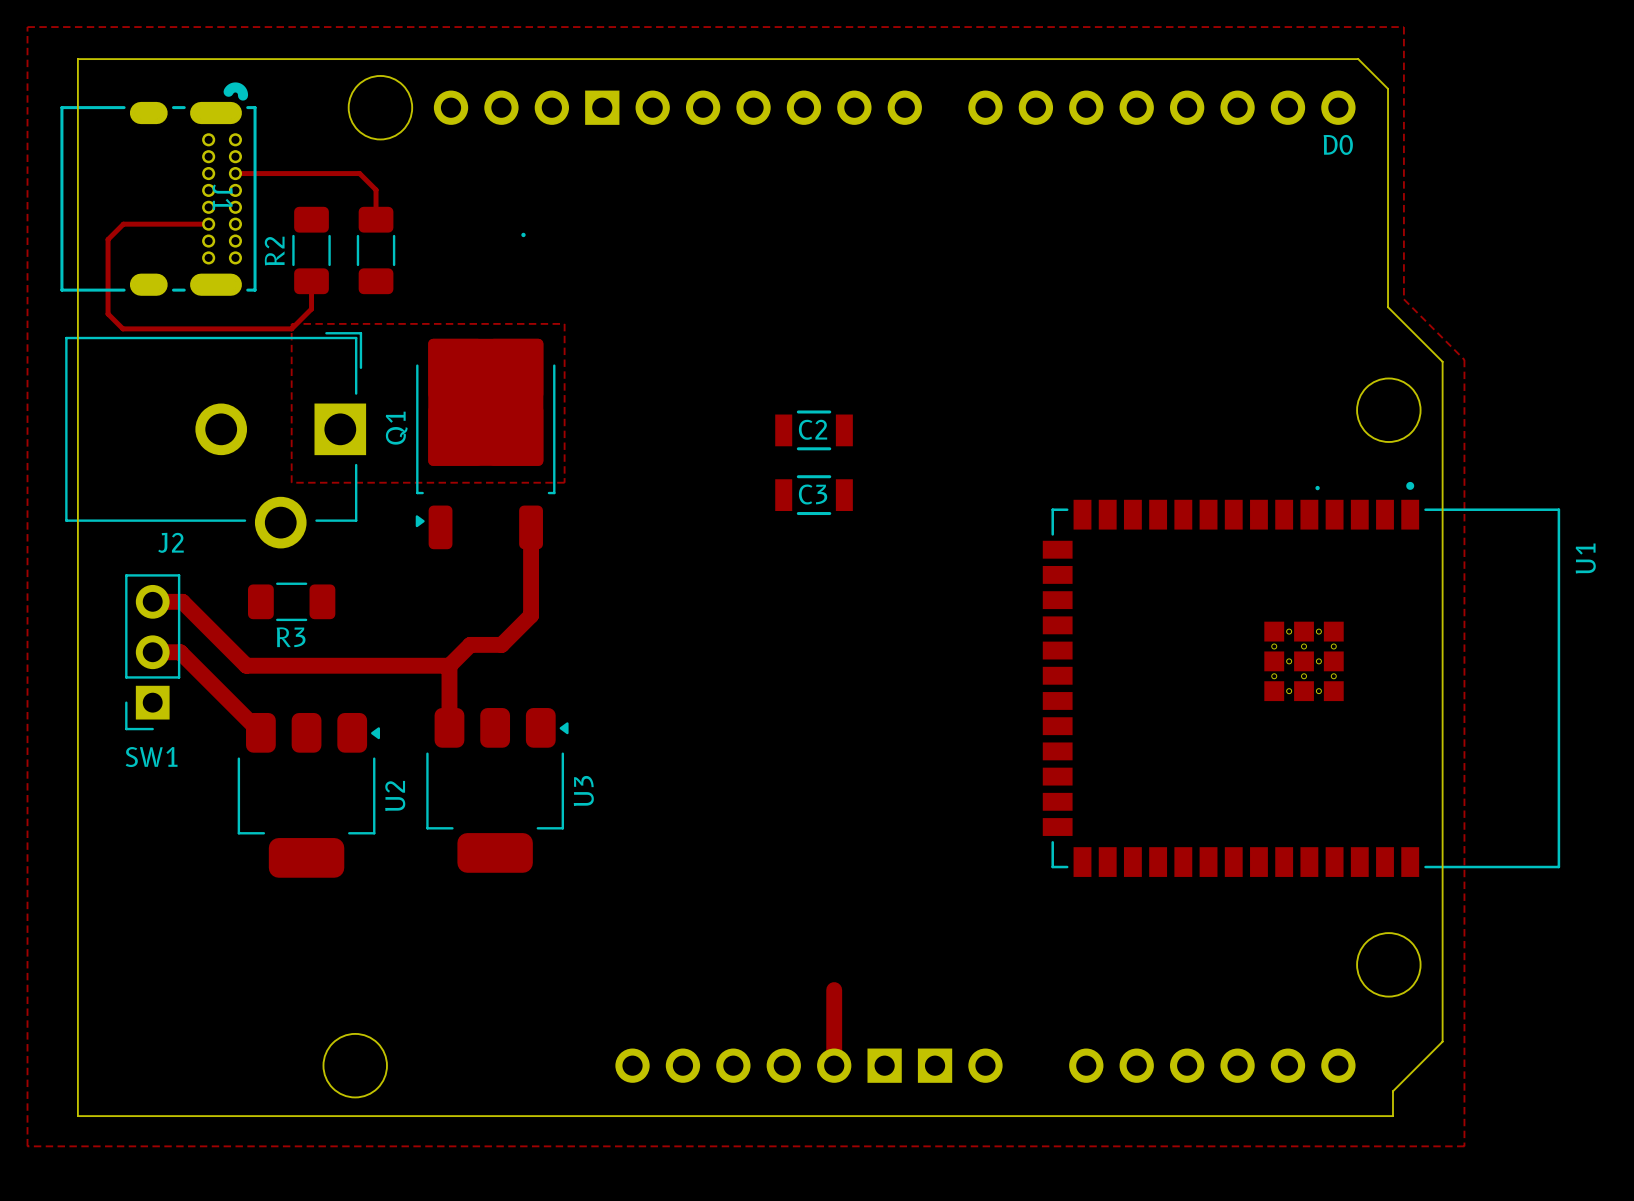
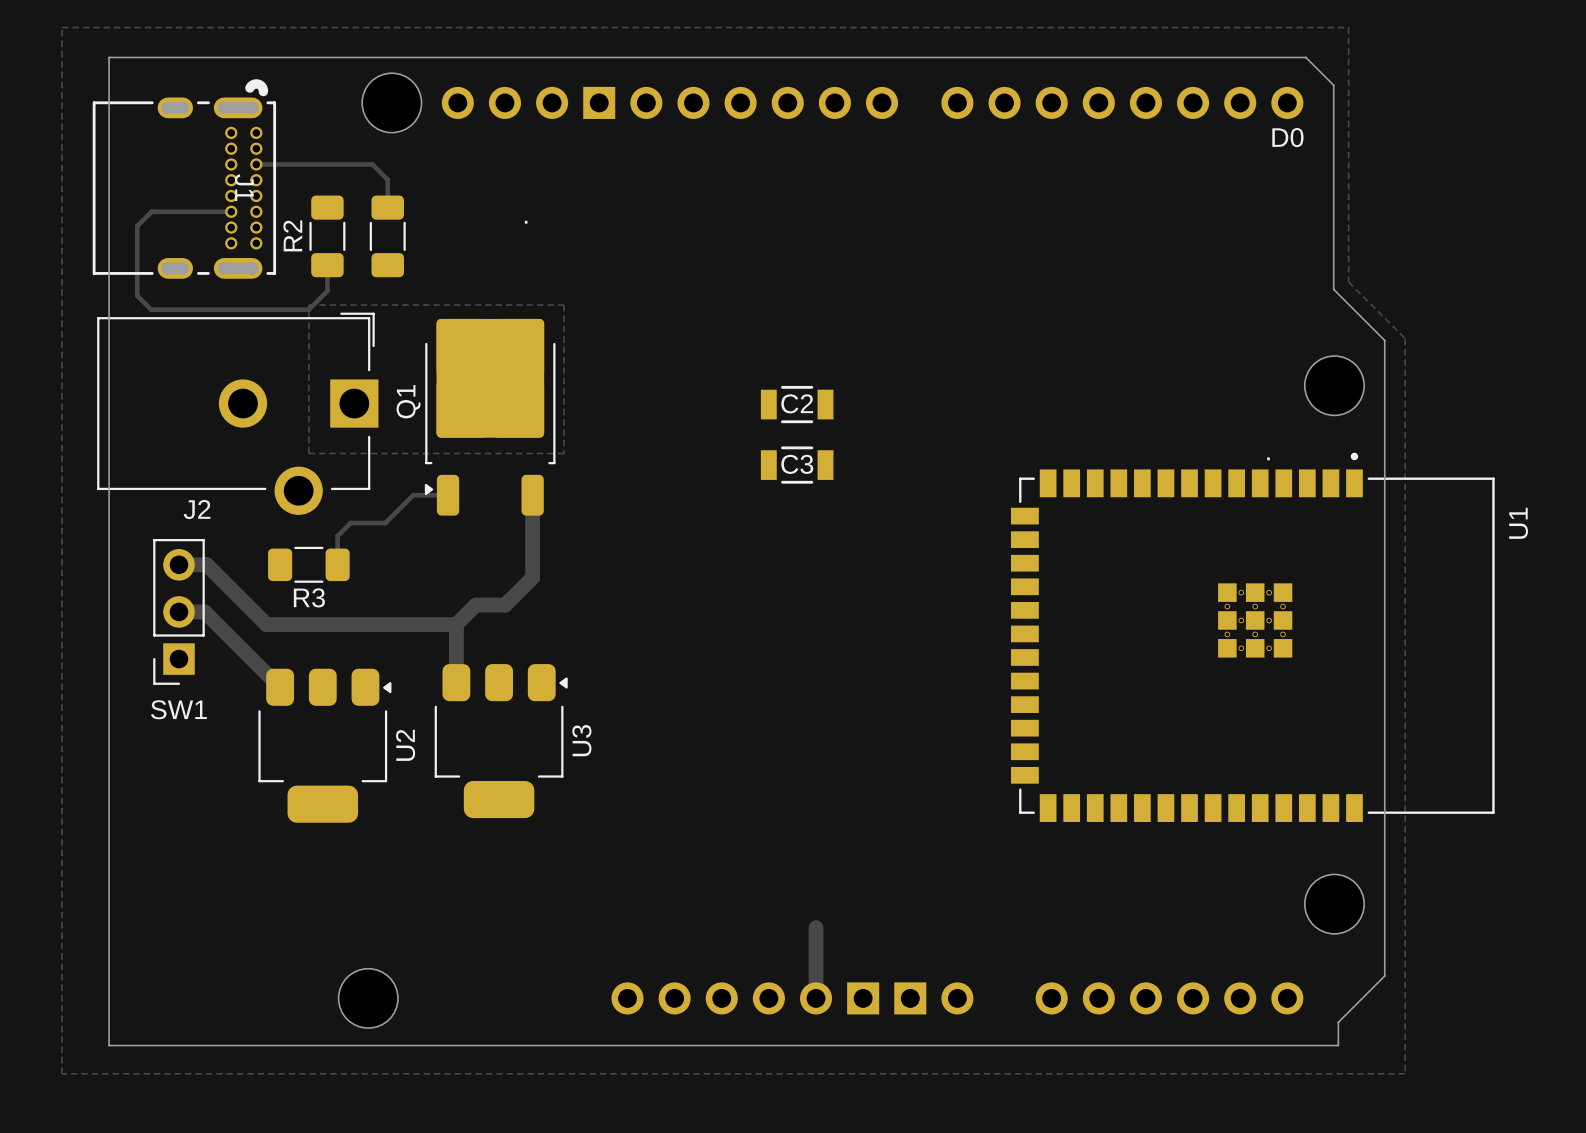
track: none -> (448, 495) (413, 495) (385, 523) (350, 523) (337, 536) (337, 564)

